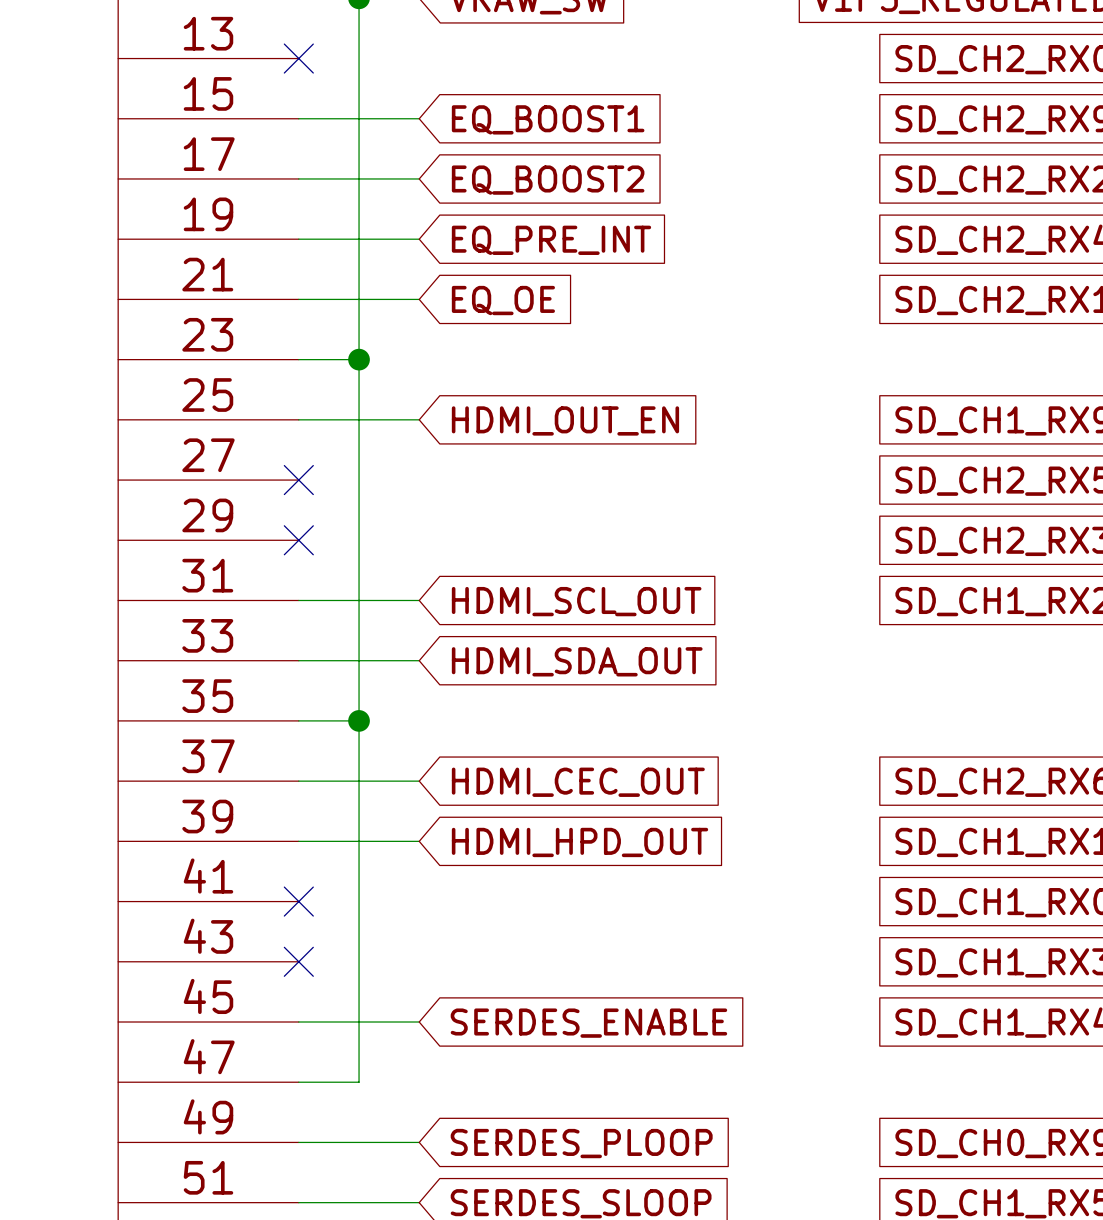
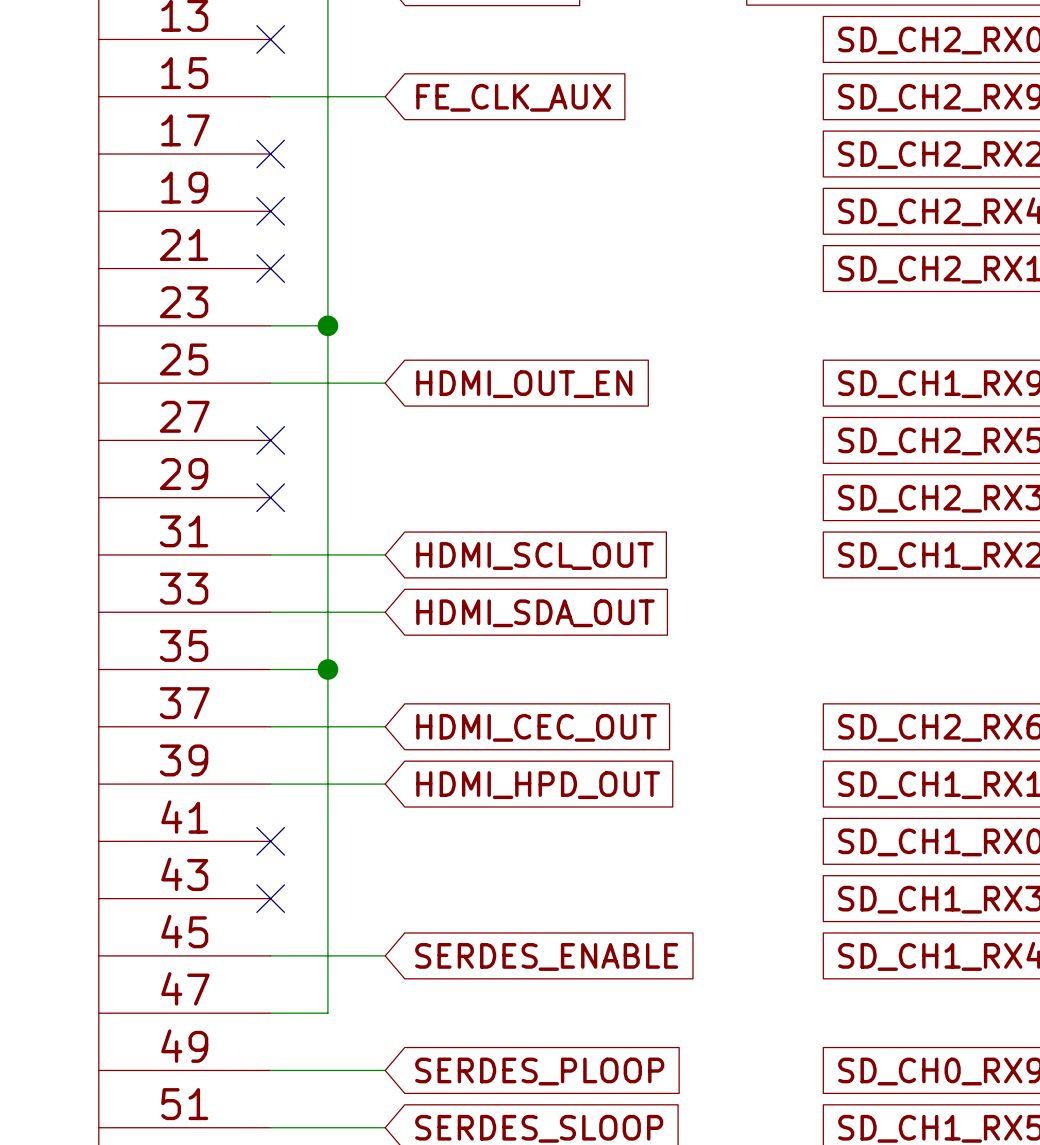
global label: EQ_BOOST1 (548, 119) -> FE_CLK_AUX (513, 97)
wire: (298, 178) (419, 178) -> none
no-connect mark: none -> (270, 154)
global label: EQ_BOOST2 (548, 180) -> none
wire: (298, 239) (419, 239) -> none
no-connect mark: none -> (270, 211)
global label: EQ_PRE_INT (551, 240) -> none
wire: (298, 299) (419, 299) -> none
no-connect mark: none -> (270, 268)
global label: EQ_OE (503, 300) -> none

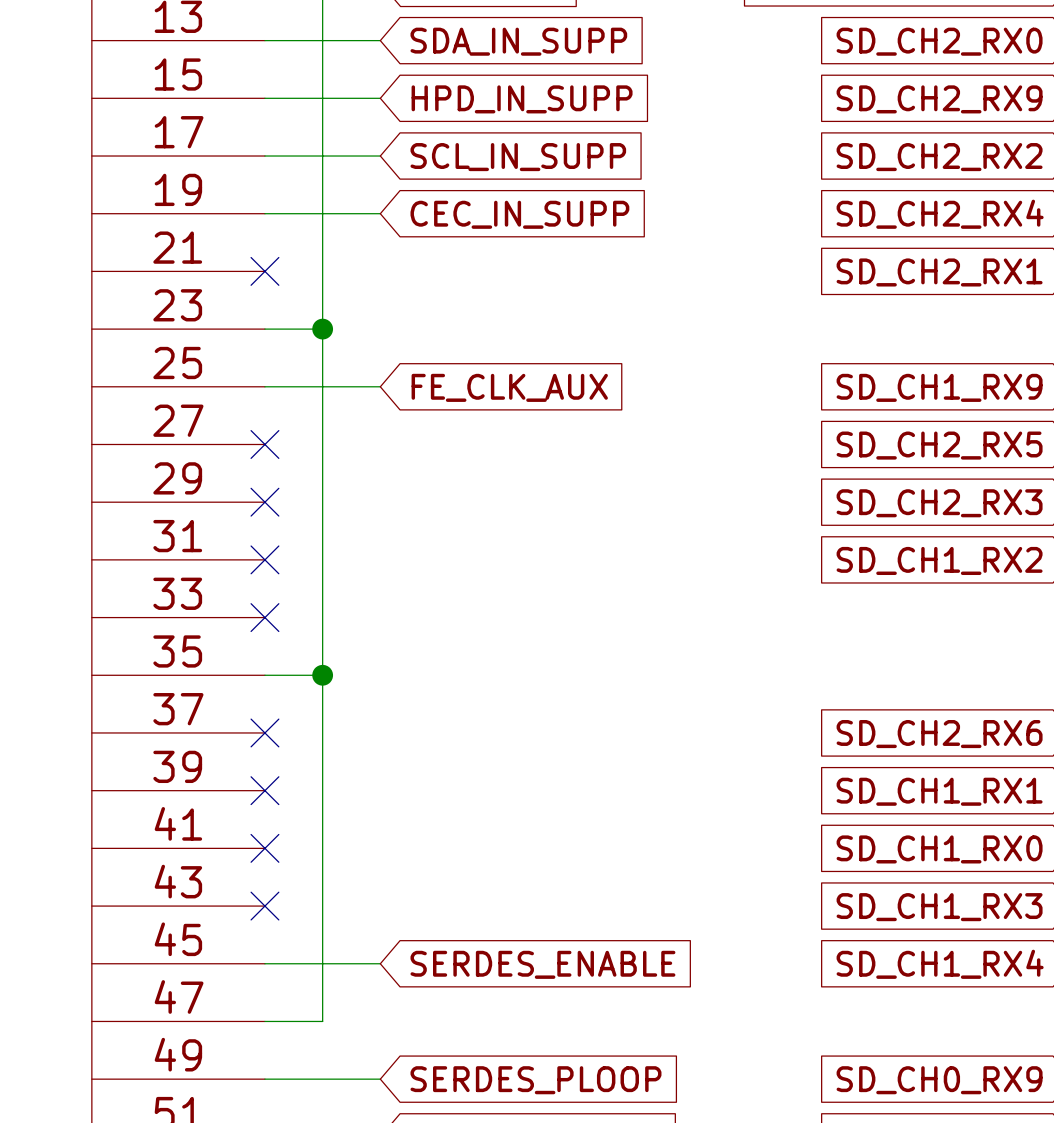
wire: none -> (264, 40) (380, 40)
no-connect mark: (270, 39) -> none
global label: none -> SDA_IN_SUPP (518, 41)
global label: FE_CLK_AUX (513, 97) -> HPD_IN_SUPP (522, 99)
no-connect mark: (270, 154) -> none
global label: none -> SCL_IN_SUPP (518, 157)
no-connect mark: (270, 211) -> none
global label: none -> CEC_IN_SUPP (519, 214)
global label: HDMI_OUT_EN (524, 384) -> FE_CLK_AUX (509, 387)
wire: (270, 554) (385, 554) -> (264, 156) (380, 156)
no-connect mark: none -> (264, 559)
global label: HDMI_SCL_OUT (534, 556) -> none
wire: (270, 612) (385, 612) -> (264, 213) (380, 213)
no-connect mark: none -> (264, 617)
global label: HDMI_SDA_OUT (535, 613) -> none
wire: (270, 726) (385, 726) -> none
no-connect mark: none -> (264, 732)
global label: HDMI_CEC_OUT (536, 727) -> none
wire: (270, 784) (385, 784) -> none
no-connect mark: none -> (264, 790)
global label: HDMI_HPD_OUT (538, 785) -> none

